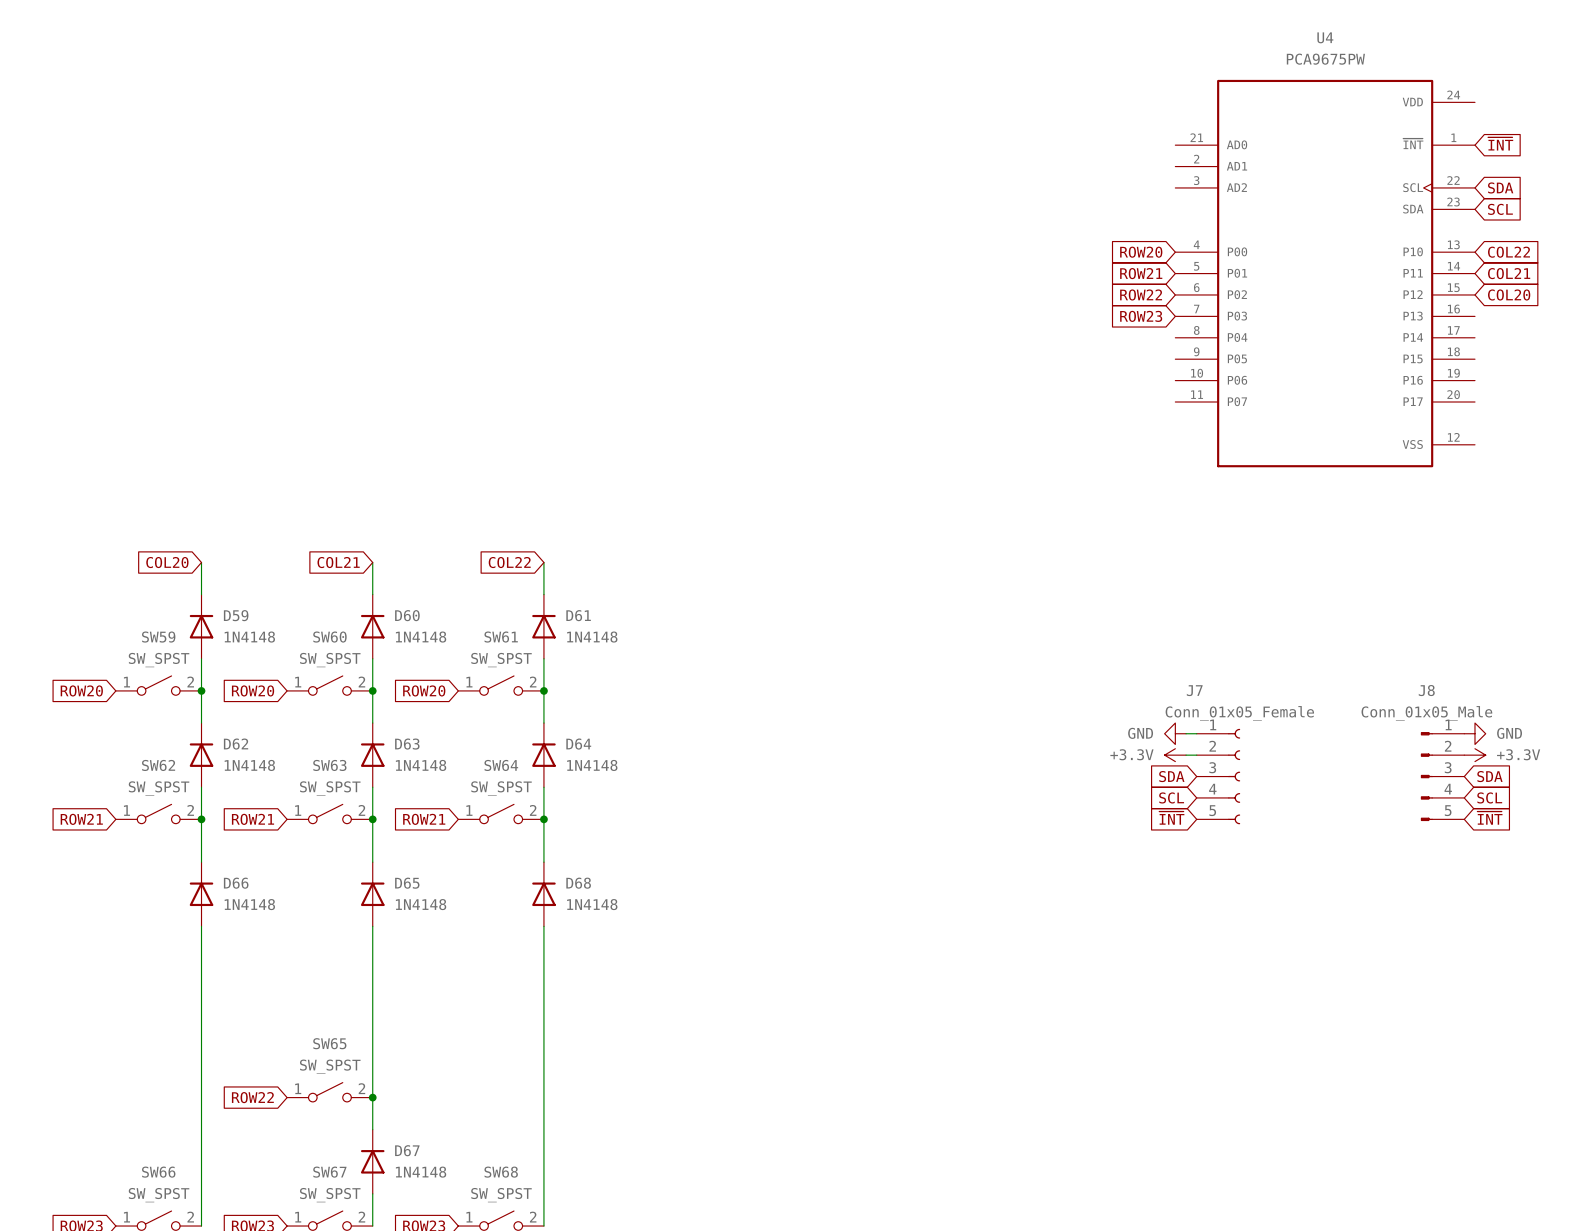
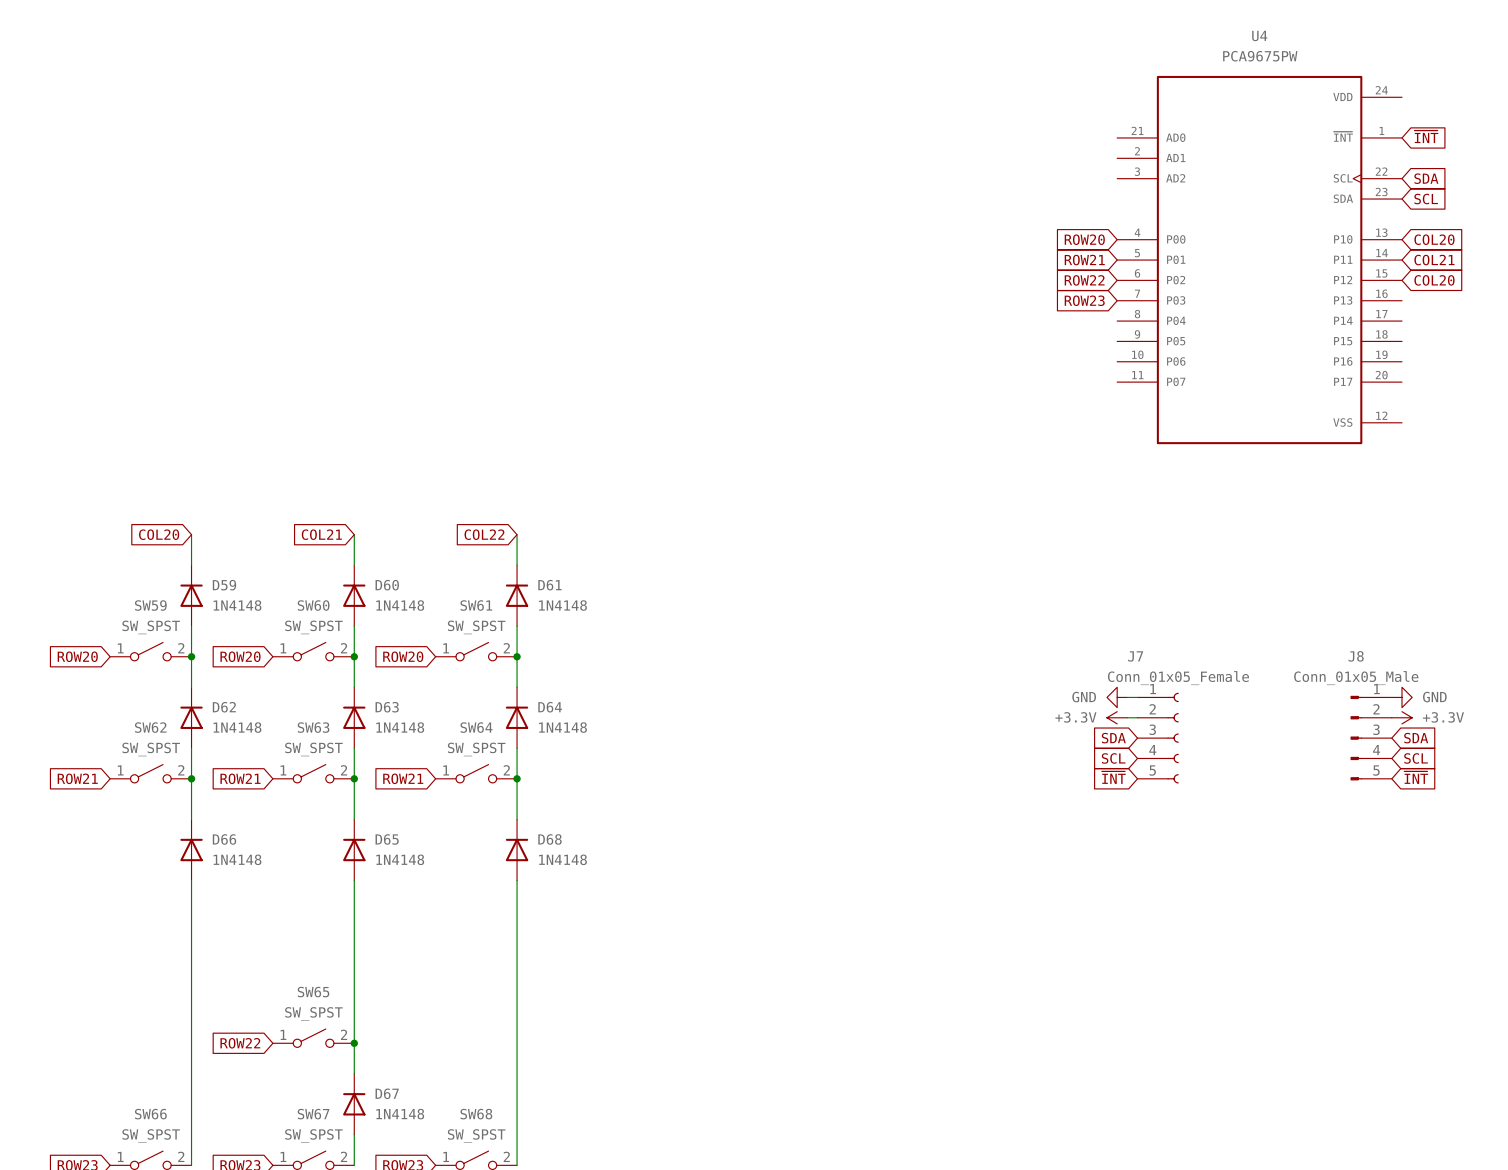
global label: COL22 (1508, 252) -> COL20 (1434, 239)

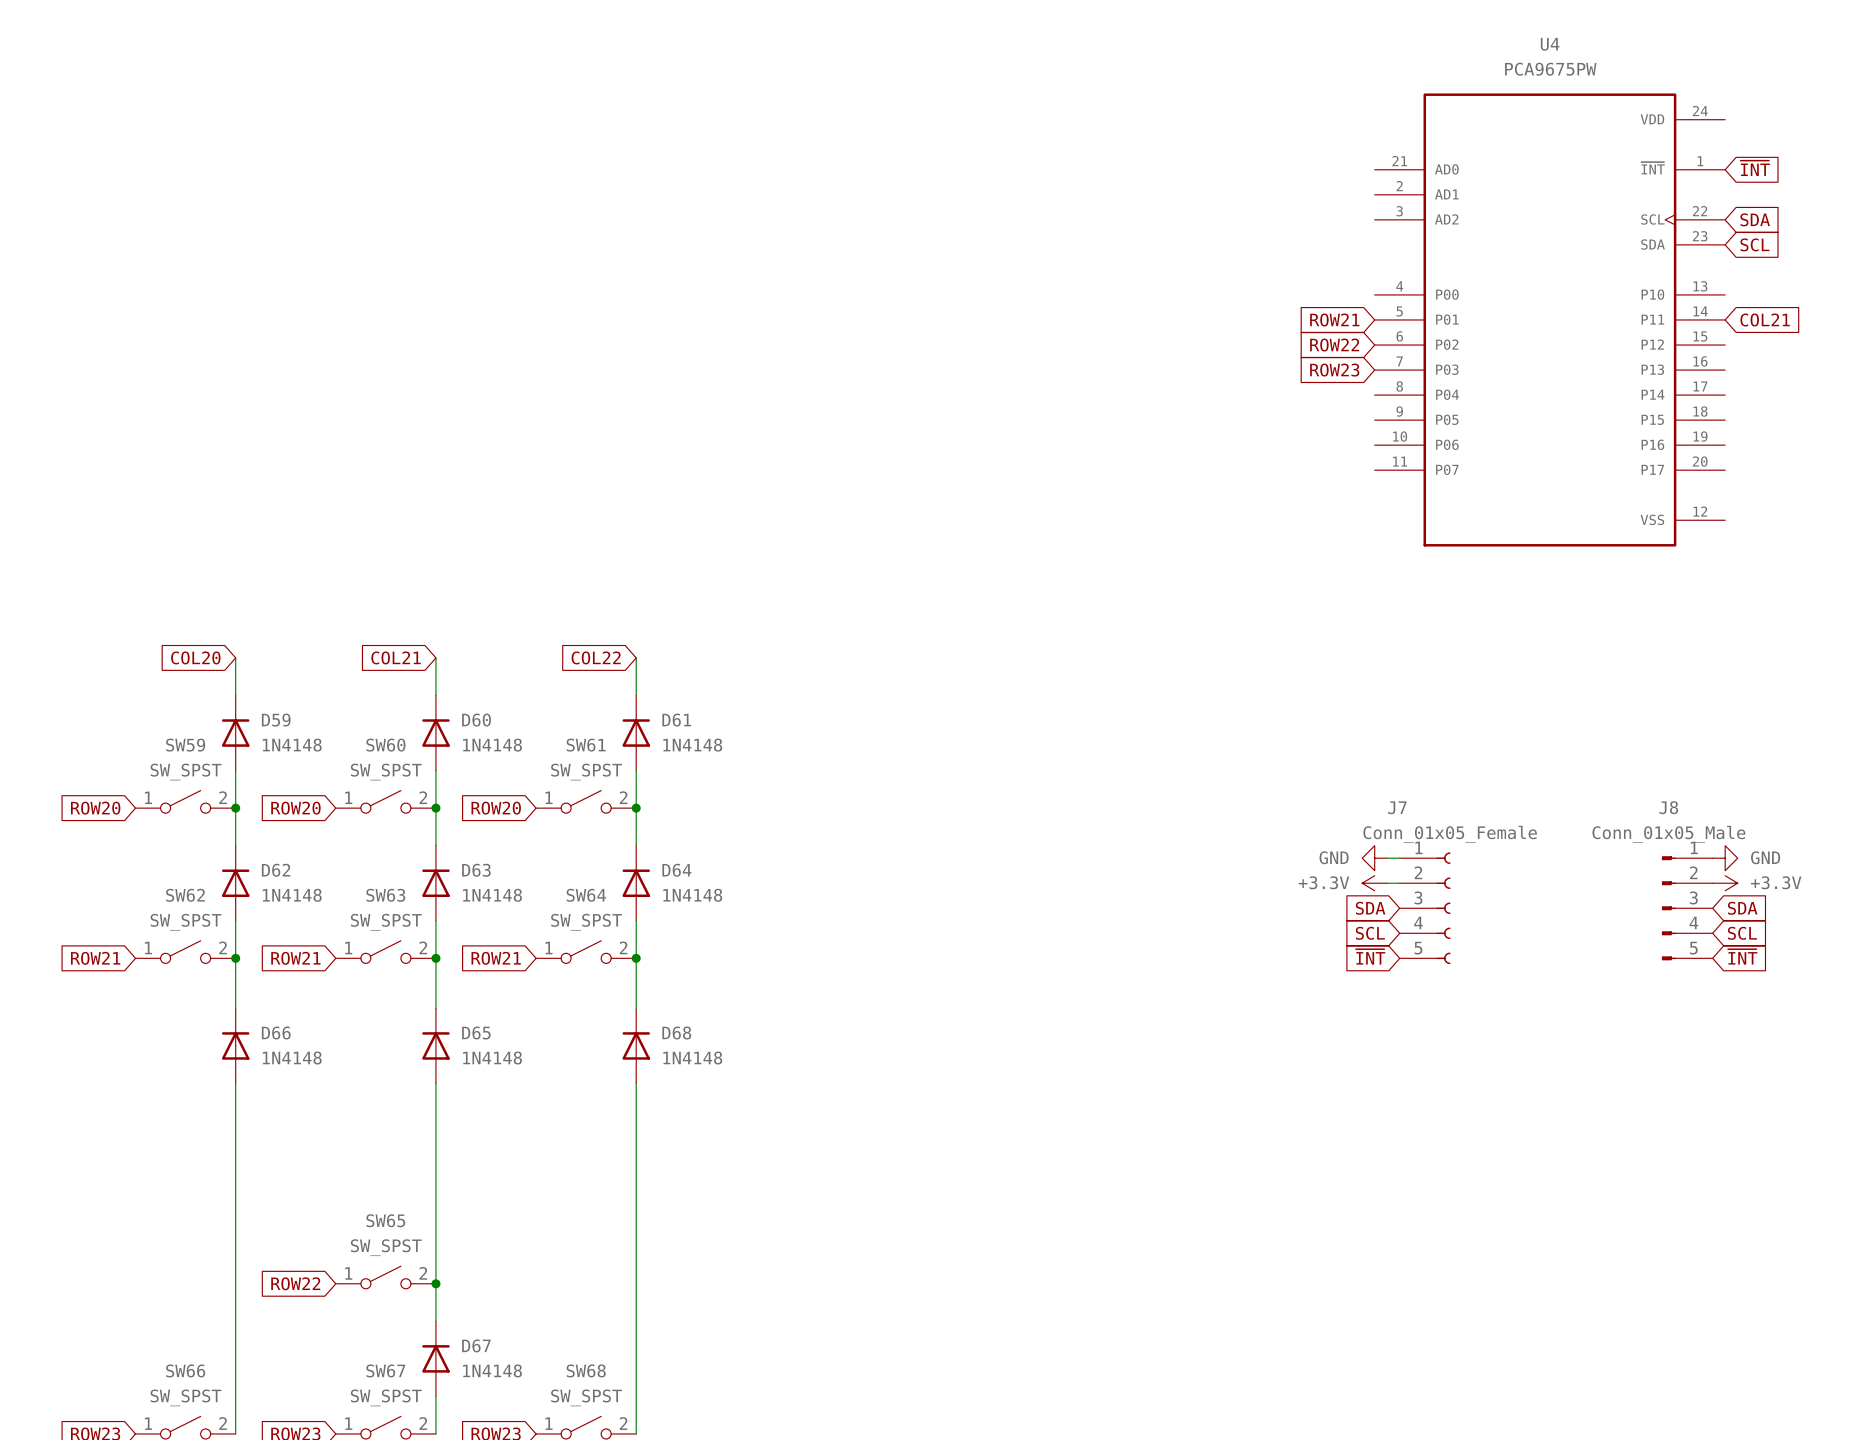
global label: ROW20 (1084, 239) -> none
global label: COL20 (1434, 239) -> none
global label: COL20 (1434, 280) -> none

